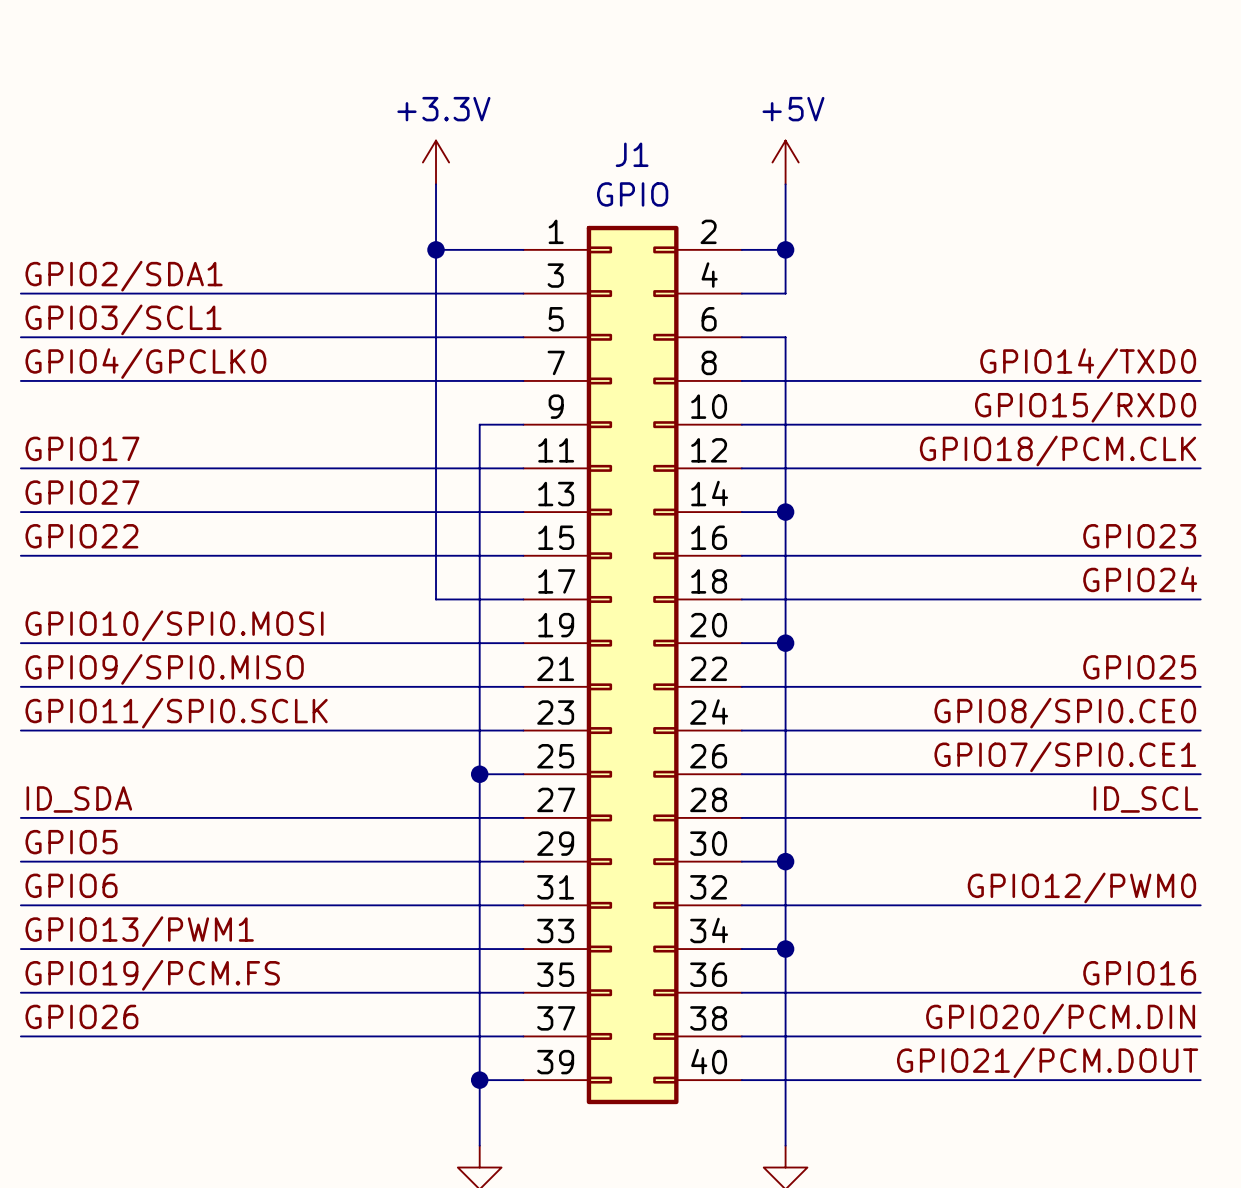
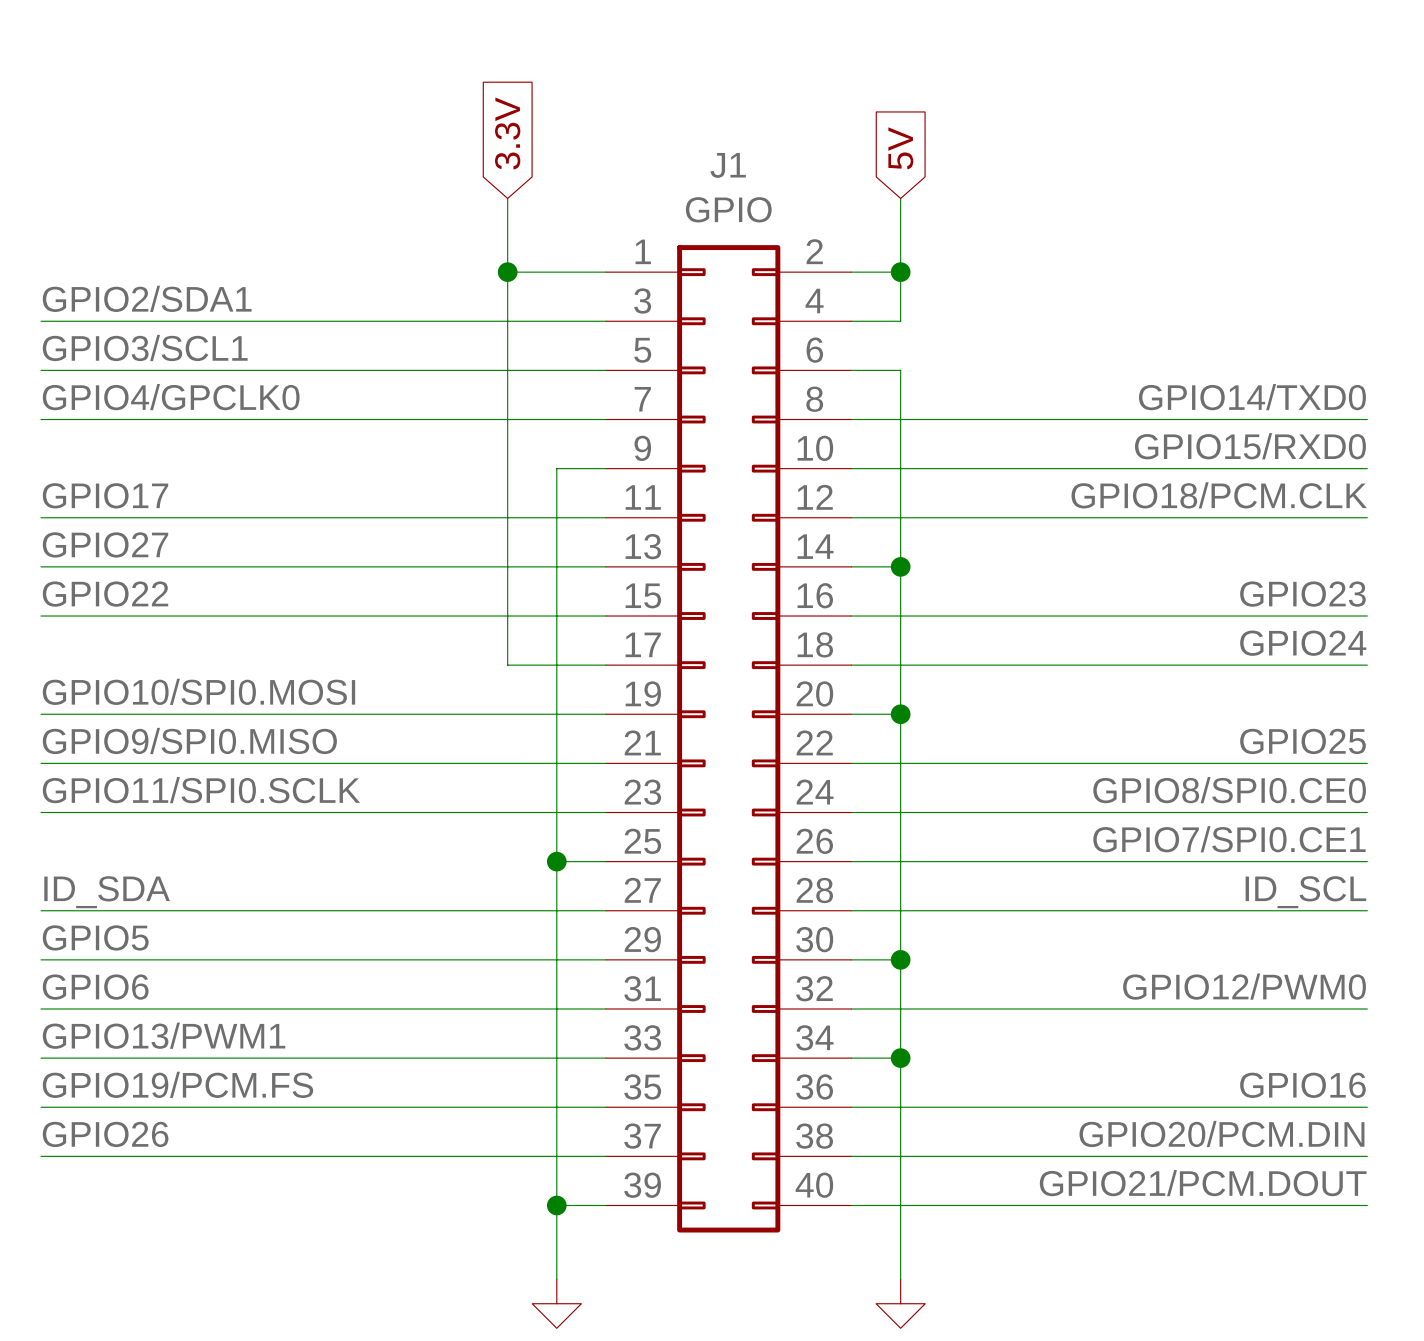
global label: none -> 3.3V (507, 133)
global label: none -> 5V (900, 148)
power symbol: +3.3V (436, 162) -> none
power symbol: +5V (785, 162) -> none

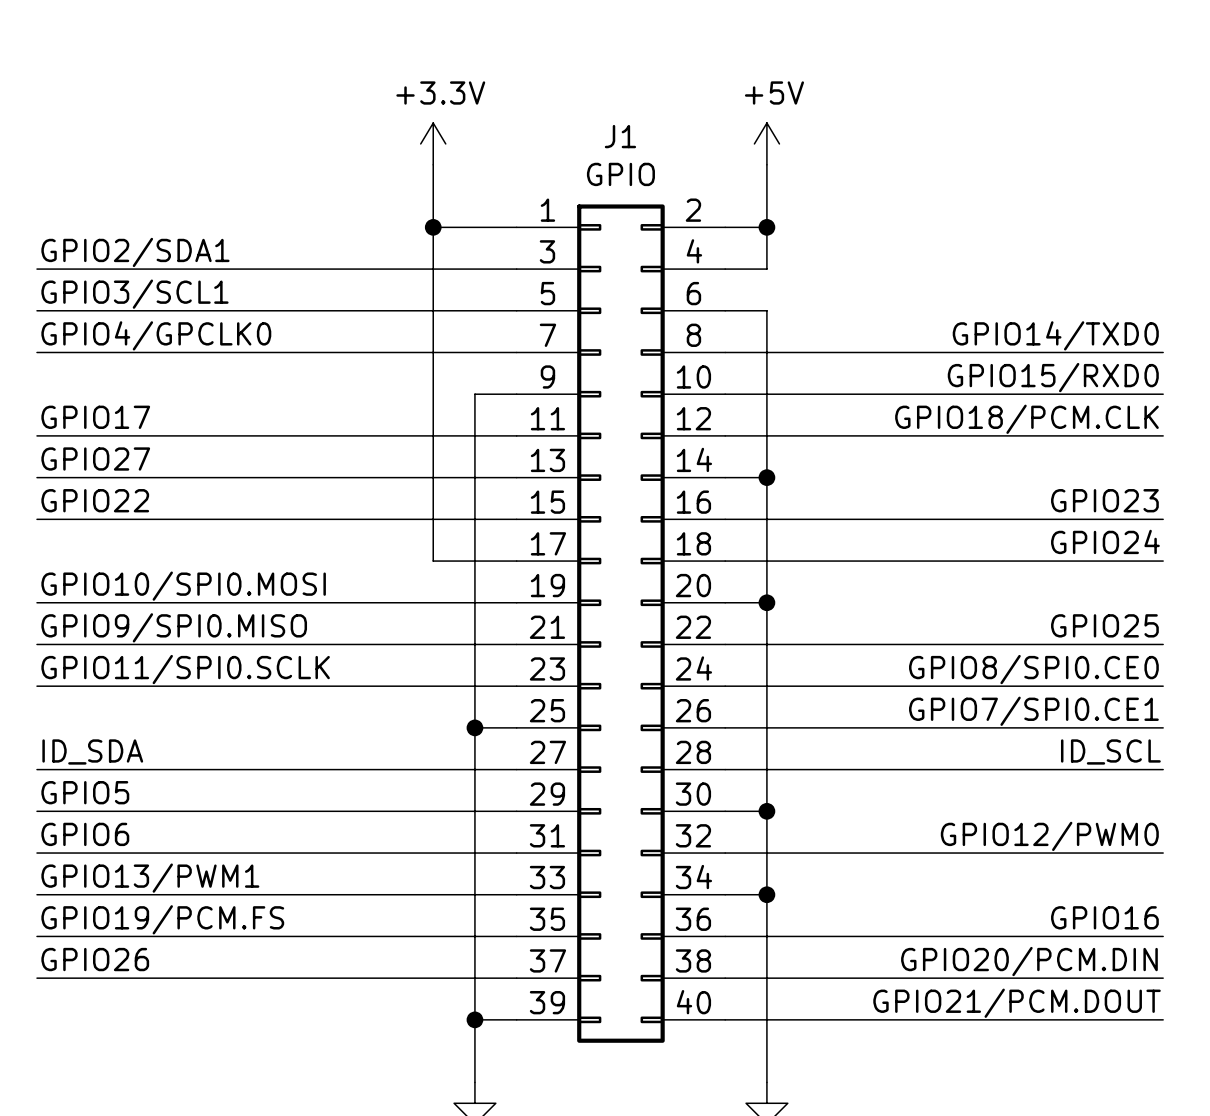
global label: 3.3V (507, 133) -> none
global label: 5V (900, 148) -> none
power symbol: none -> +3.3V (433, 143)
power symbol: none -> +5V (766, 143)

